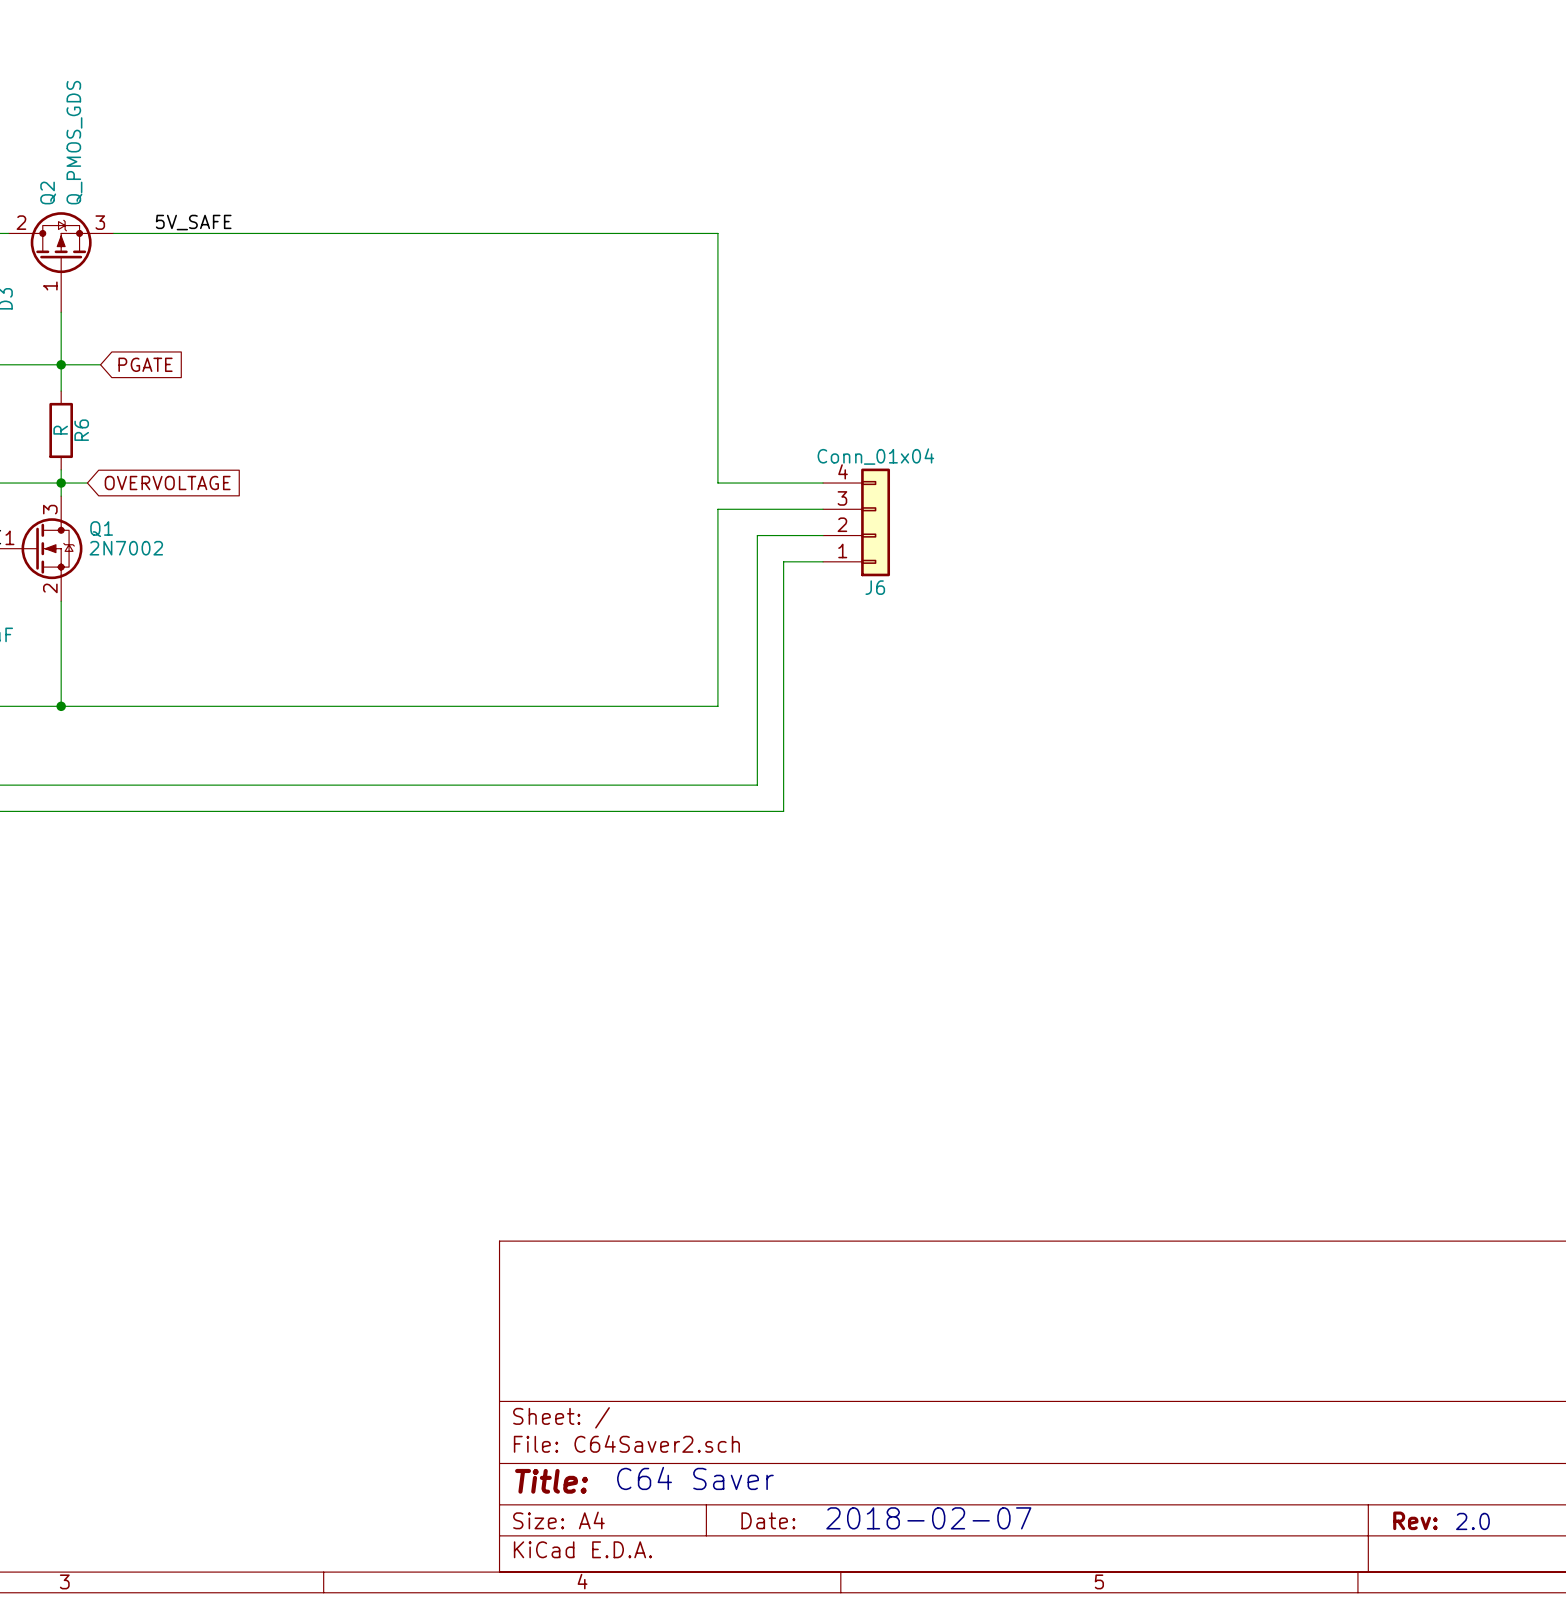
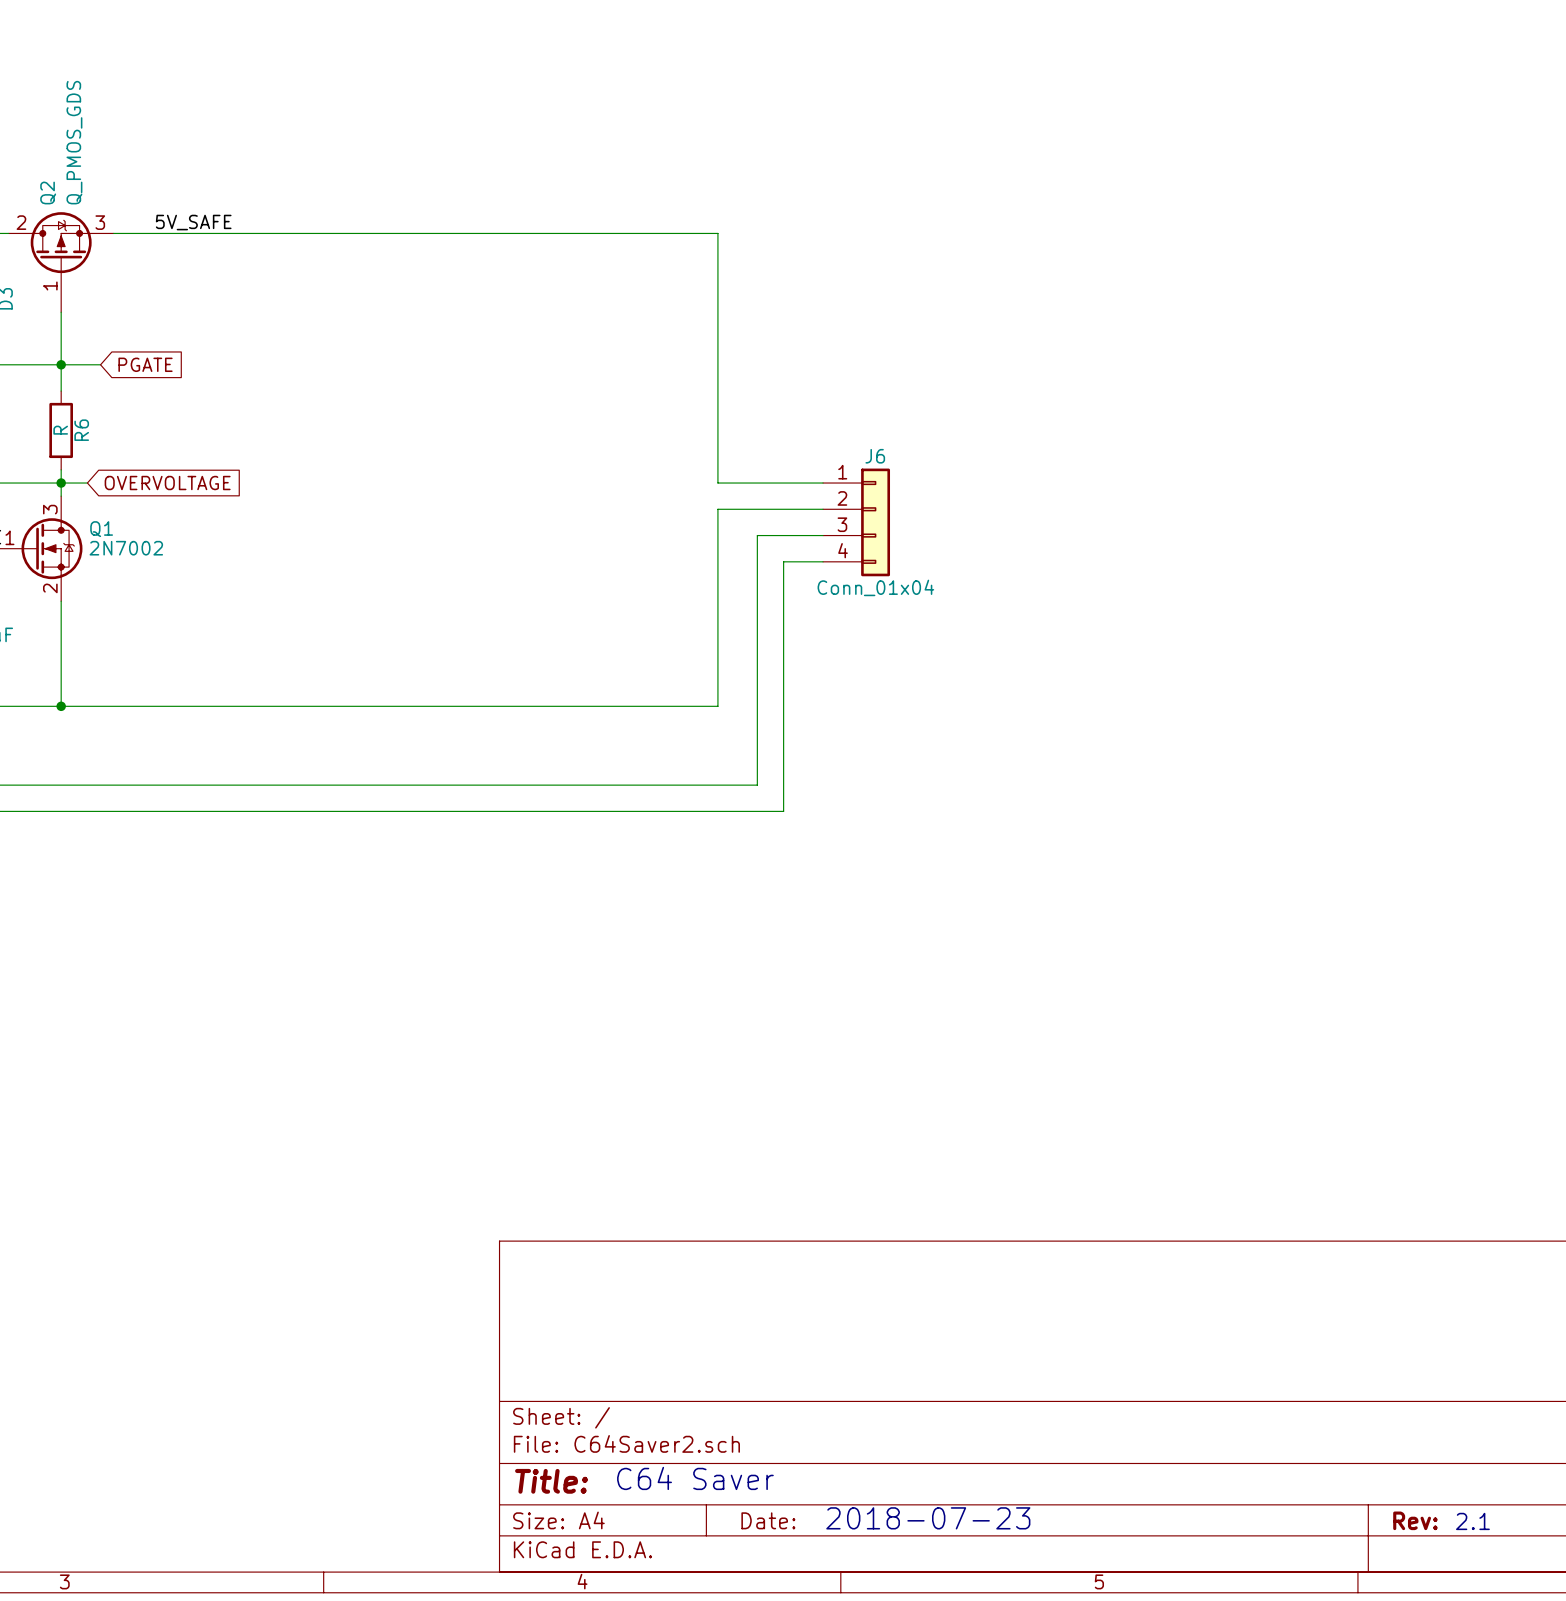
J6 flip: as is (875, 522) -> up-down (875, 522)
text: 2018-02-07 (928, 1518) -> 2018-07-23 (928, 1518)
text: 2.0 (1472, 1521) -> 2.1 (1472, 1521)

